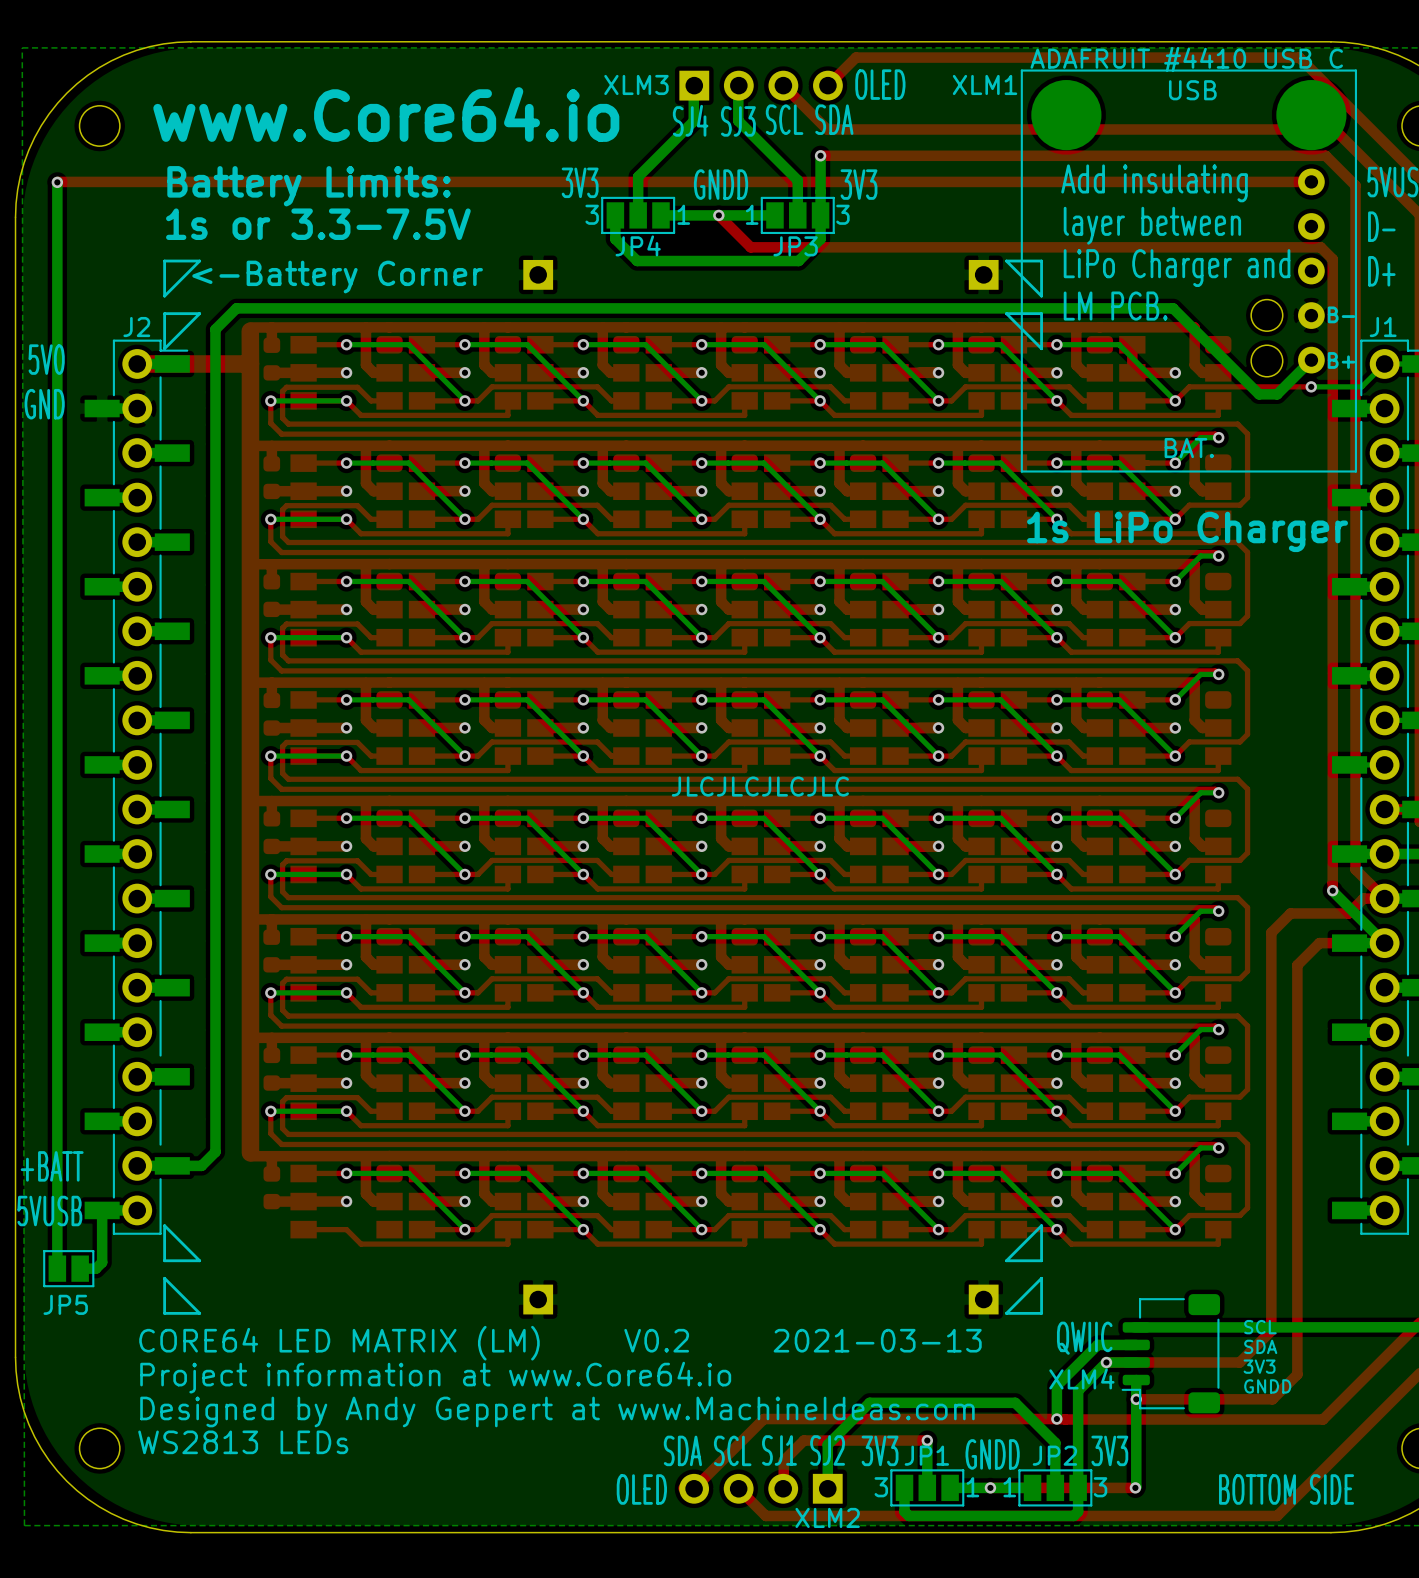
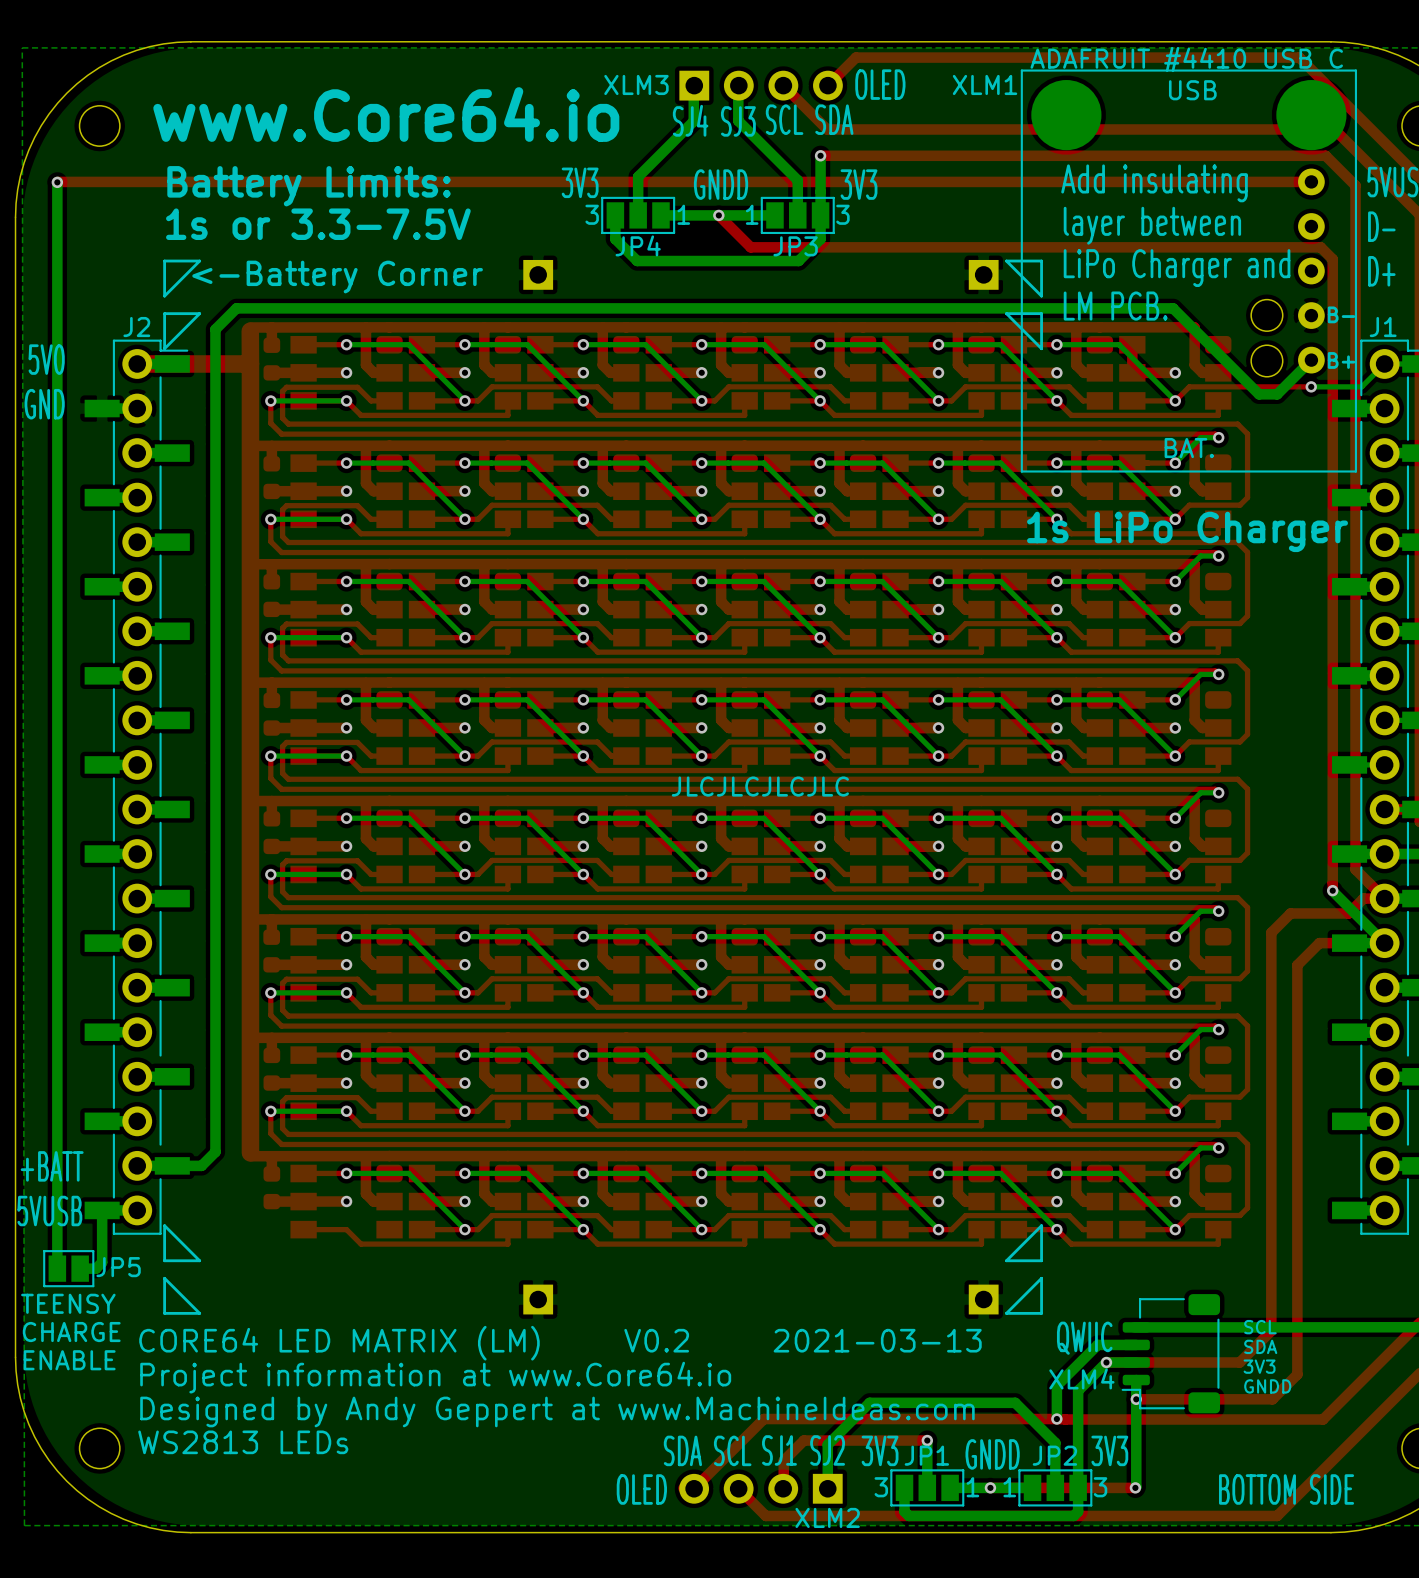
text: none -> TEENSY (68, 1303)
JP5 name position: JP5 (65, 1304) -> JP5 (118, 1267)
text: none -> CHARGE (71, 1332)
text: none -> ENABLE (69, 1360)

